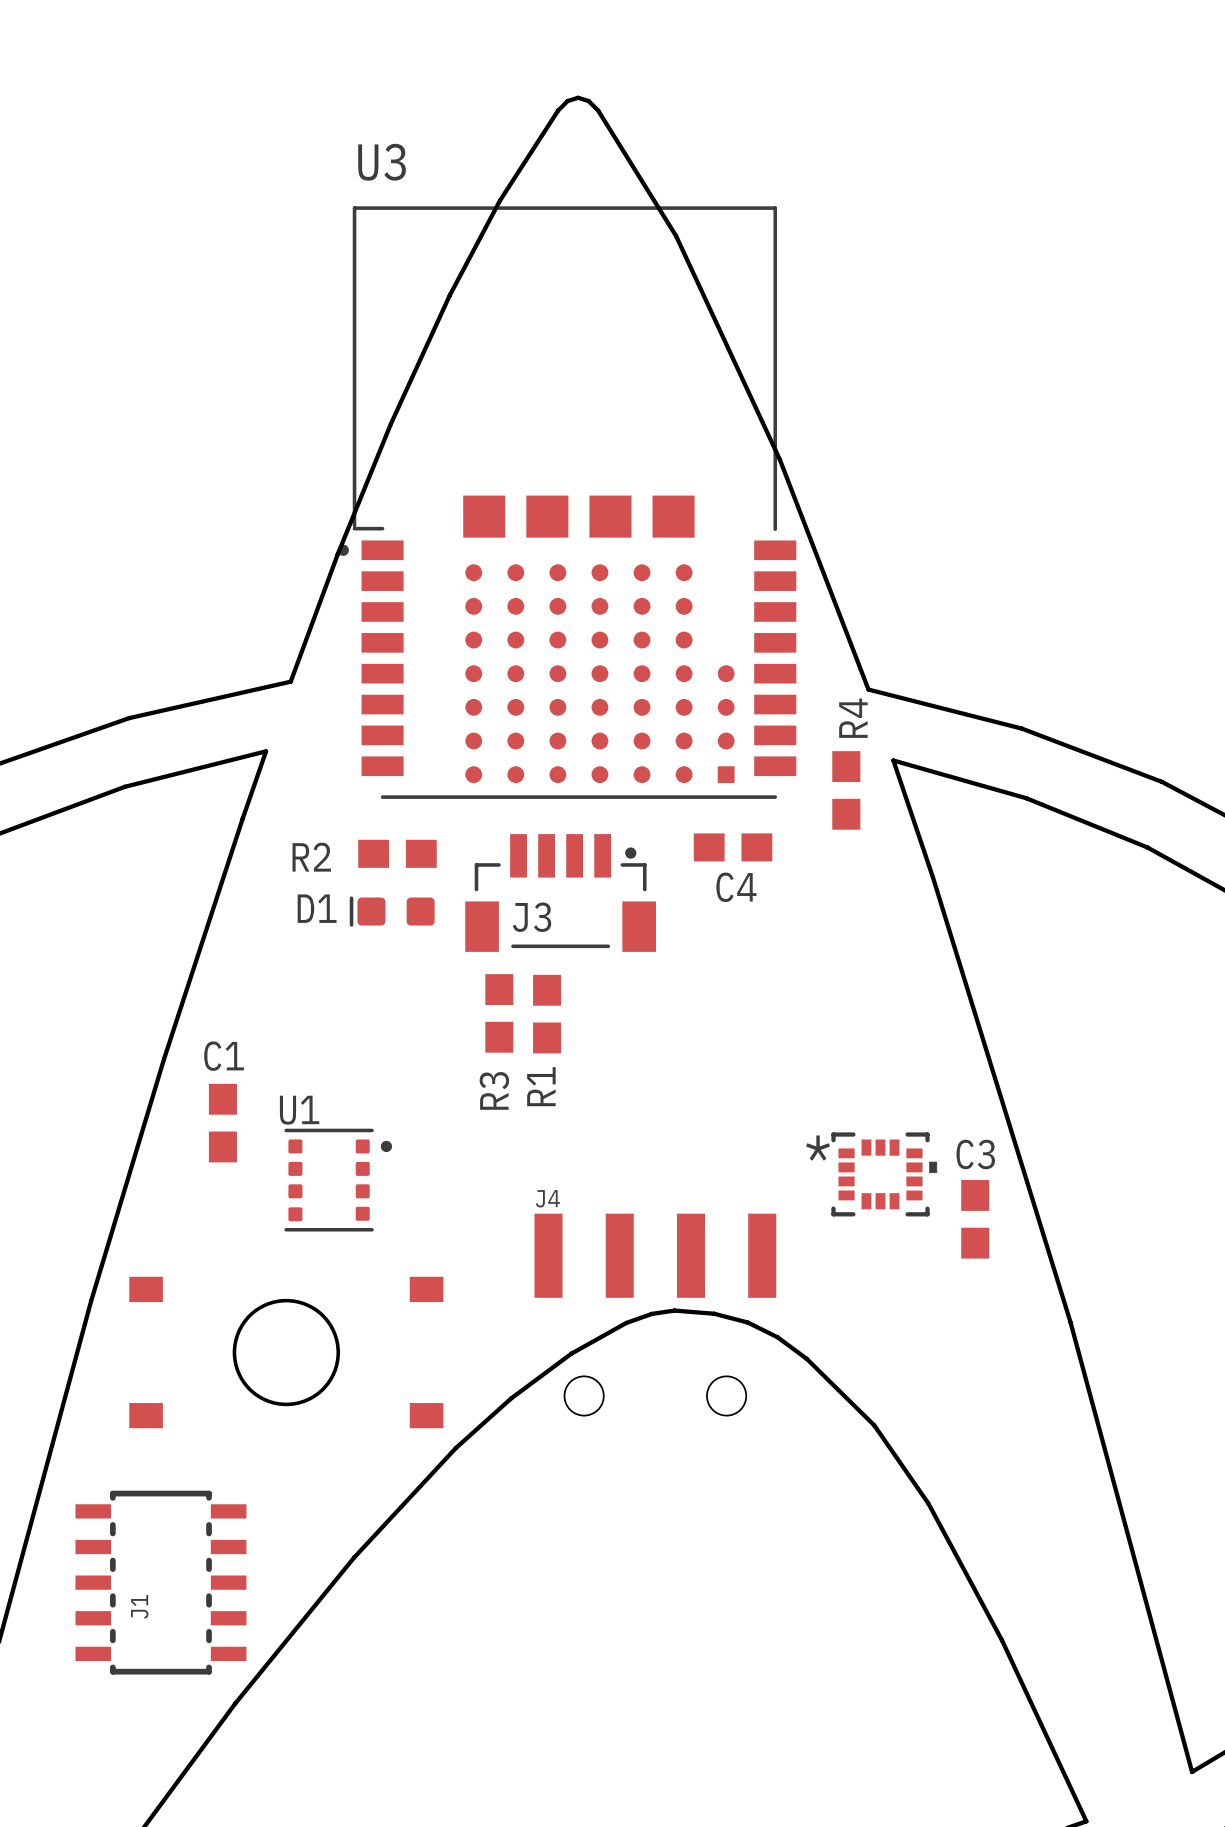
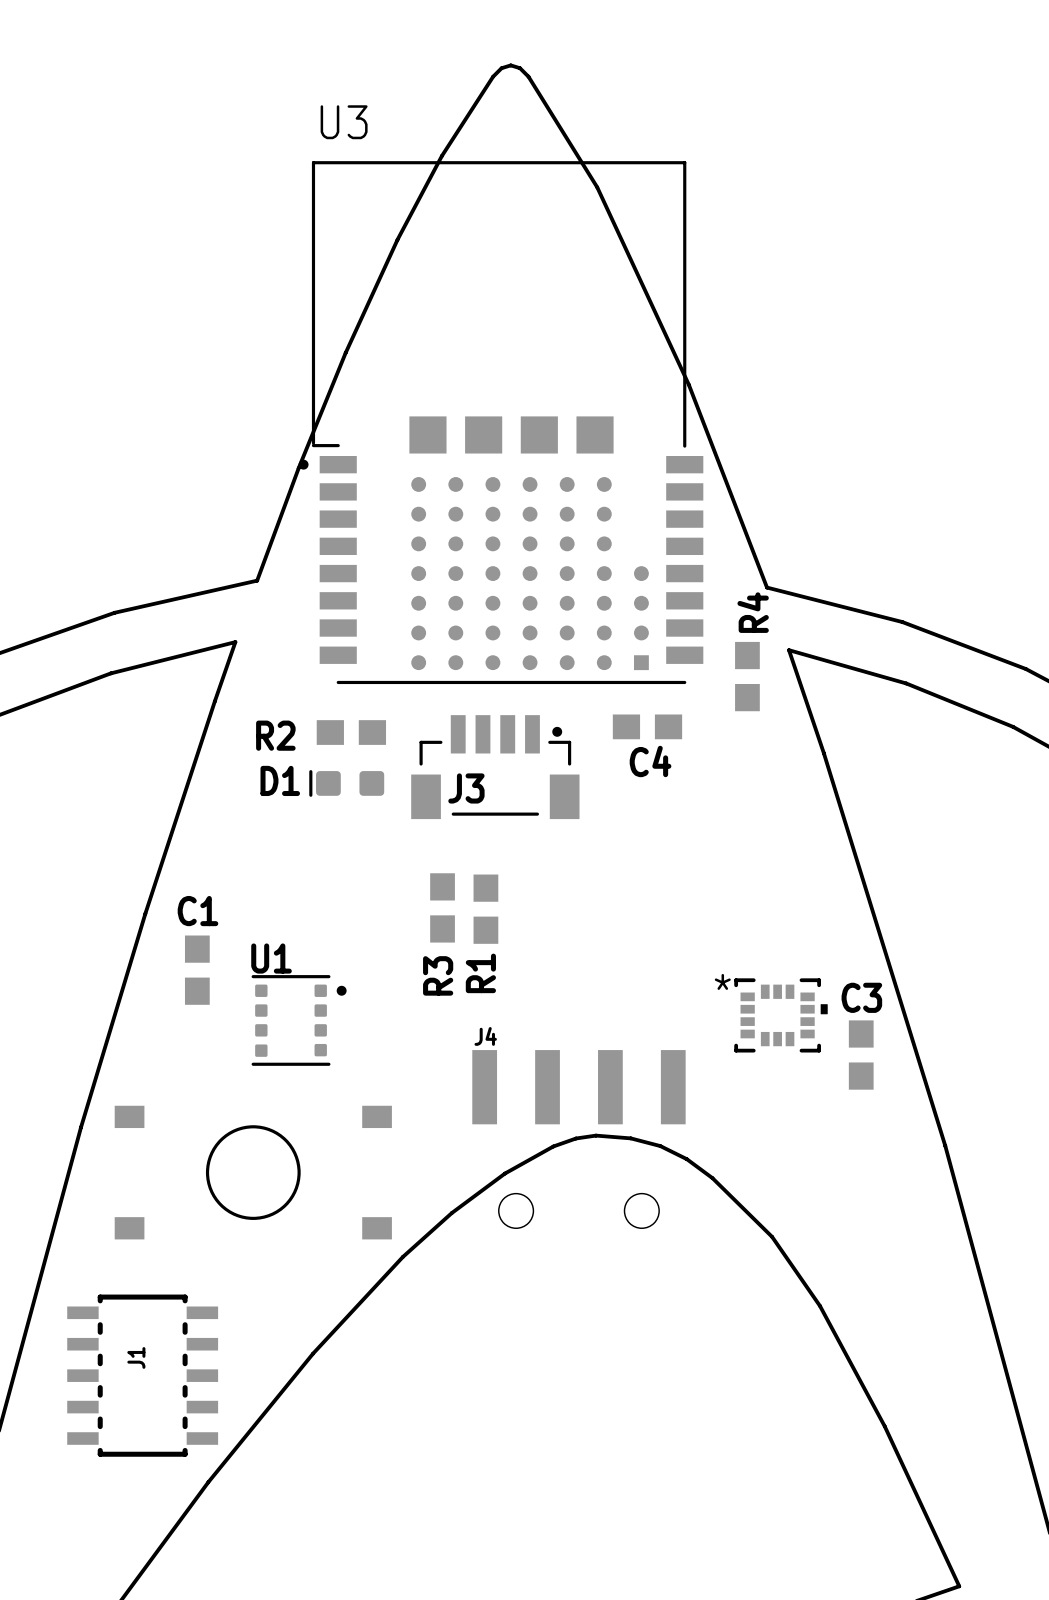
R3 position: (499, 1013) -> (442, 907)
R1 position: (547, 1014) -> (485, 909)
J1 name position: J1 (139, 1606) -> J1 (136, 1357)

